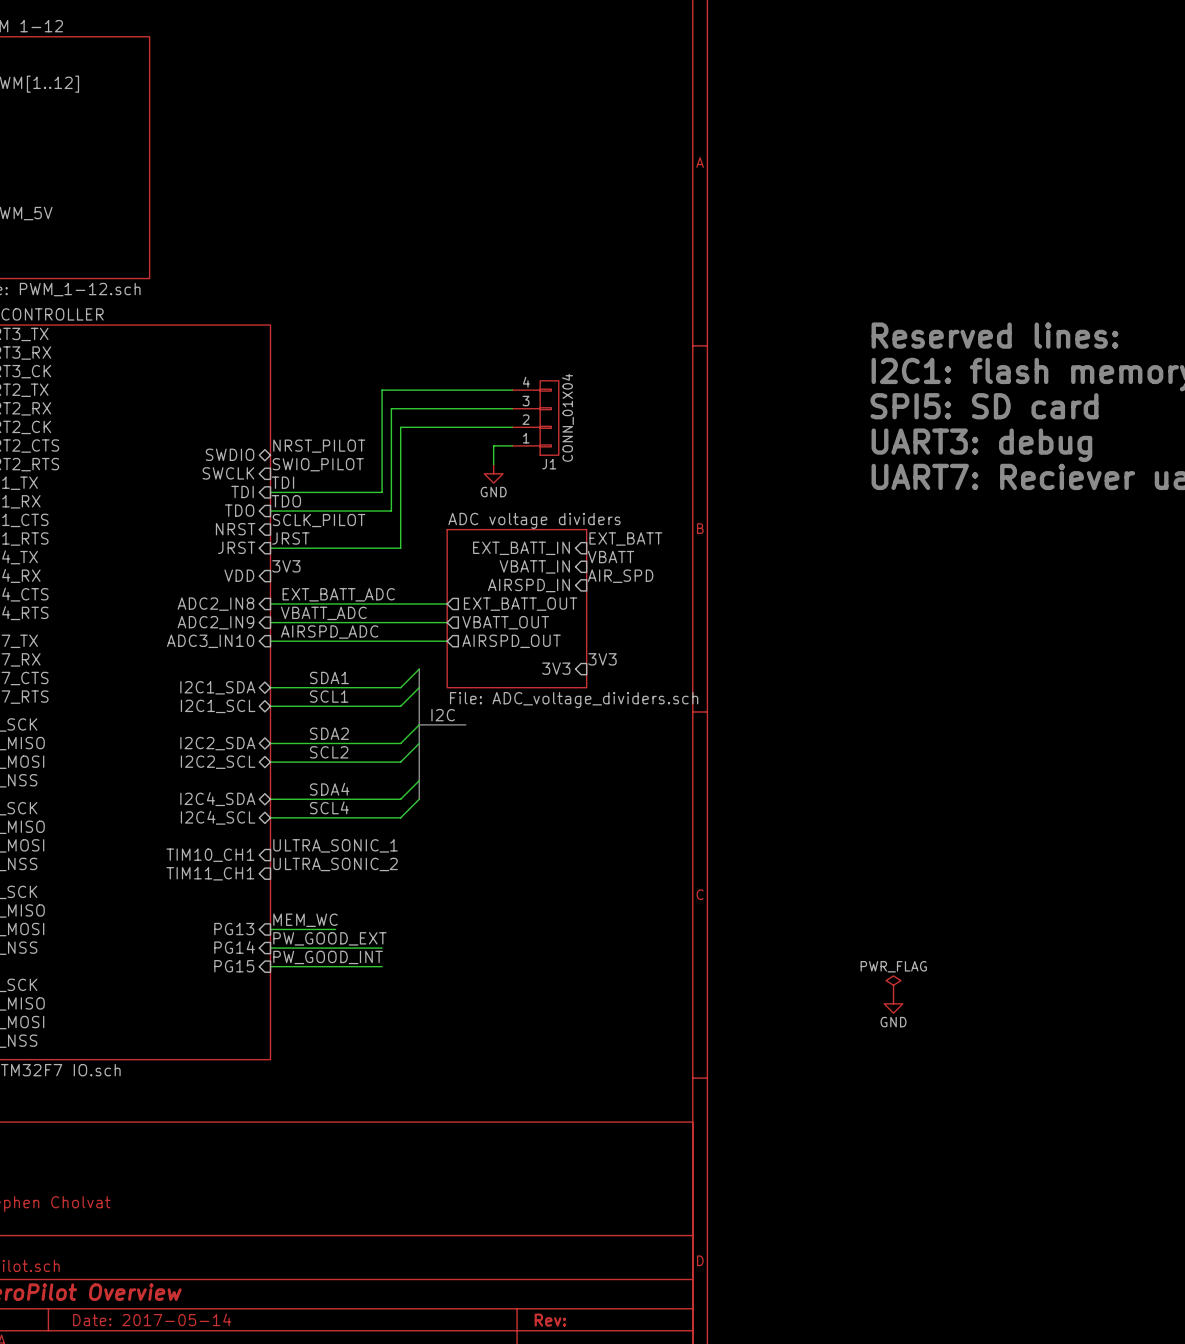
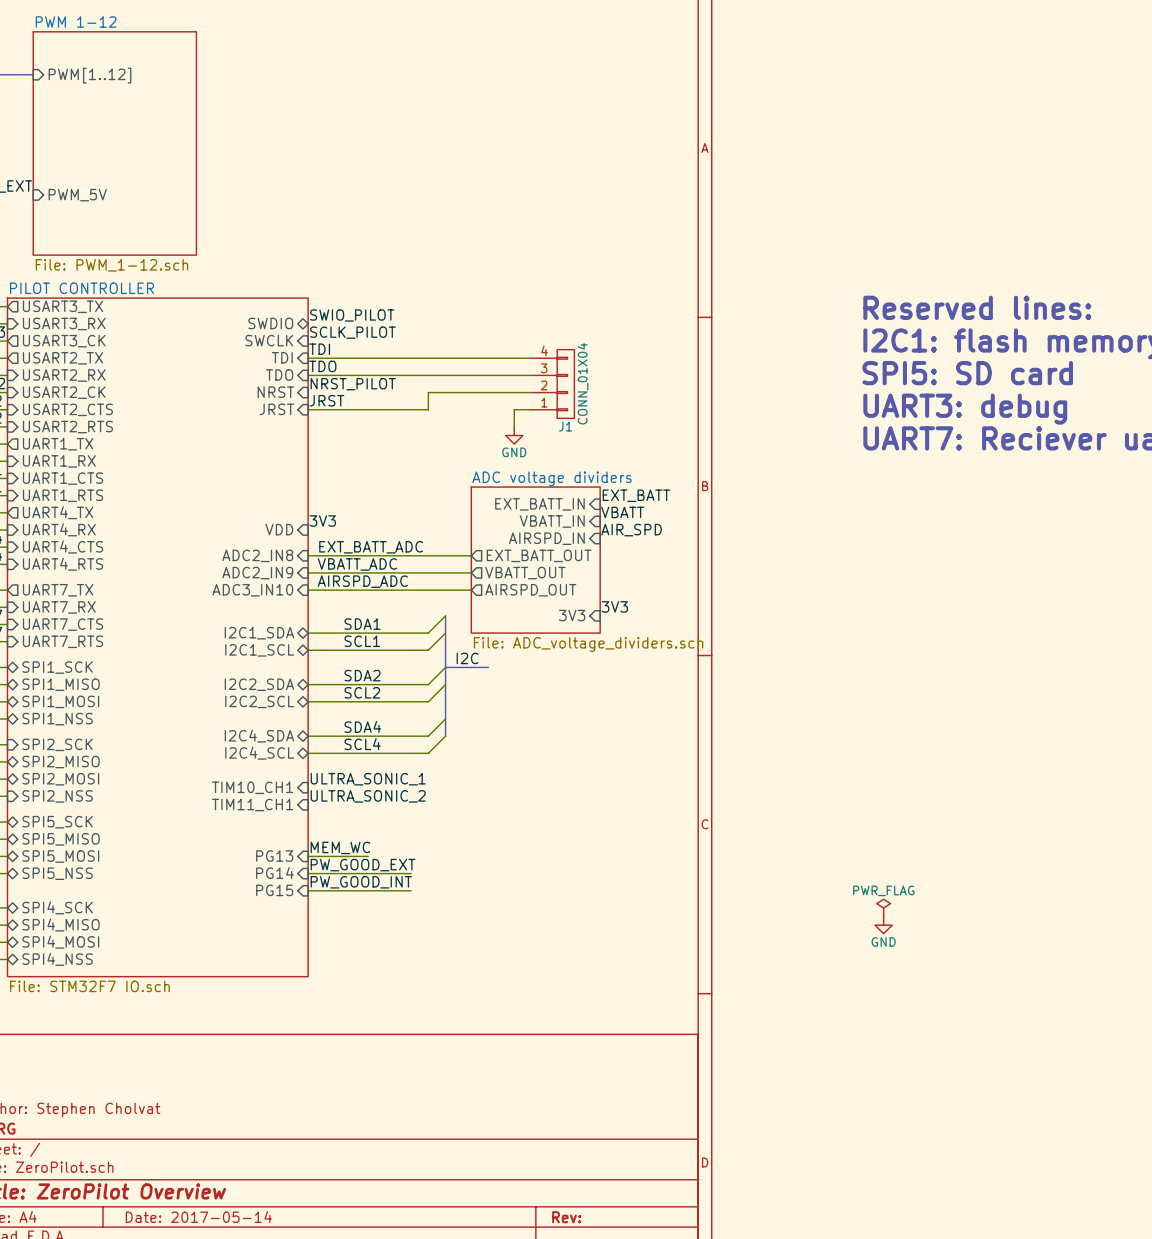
wire: (382, 390) (382, 492) (270, 492) -> (411, 358) (308, 358)
wire: (391, 408) (391, 511) (270, 511) -> (419, 375) (308, 375)
wire: (400, 445) (400, 548) (270, 548) -> (428, 409) (308, 409)
label position: NRST_PILOT (319, 446) -> NRST_PILOT (353, 384)
sheet pin position: SWDIO (230, 454) -> SWDIO (270, 323)
label position: SWIO_PILOT (318, 464) -> SWIO_PILOT (352, 315)
sheet pin position: SWCLK (228, 473) -> SWCLK (269, 340)
label position: TDI (282, 482) -> TDI (319, 349)
sheet pin position: TDI (242, 491) -> TDI (282, 357)
label position: TDO (286, 501) -> TDO (322, 366)
sheet pin position: TDO (239, 510) -> TDO (279, 375)
label position: SCLK_PILOT (319, 520) -> SCLK_PILOT (352, 332)
sheet pin position: NRST (235, 529) -> NRST (275, 392)
label position: JRST (290, 538) -> JRST (326, 400)
sheet pin position: JRST (236, 547) -> JRST (276, 409)

